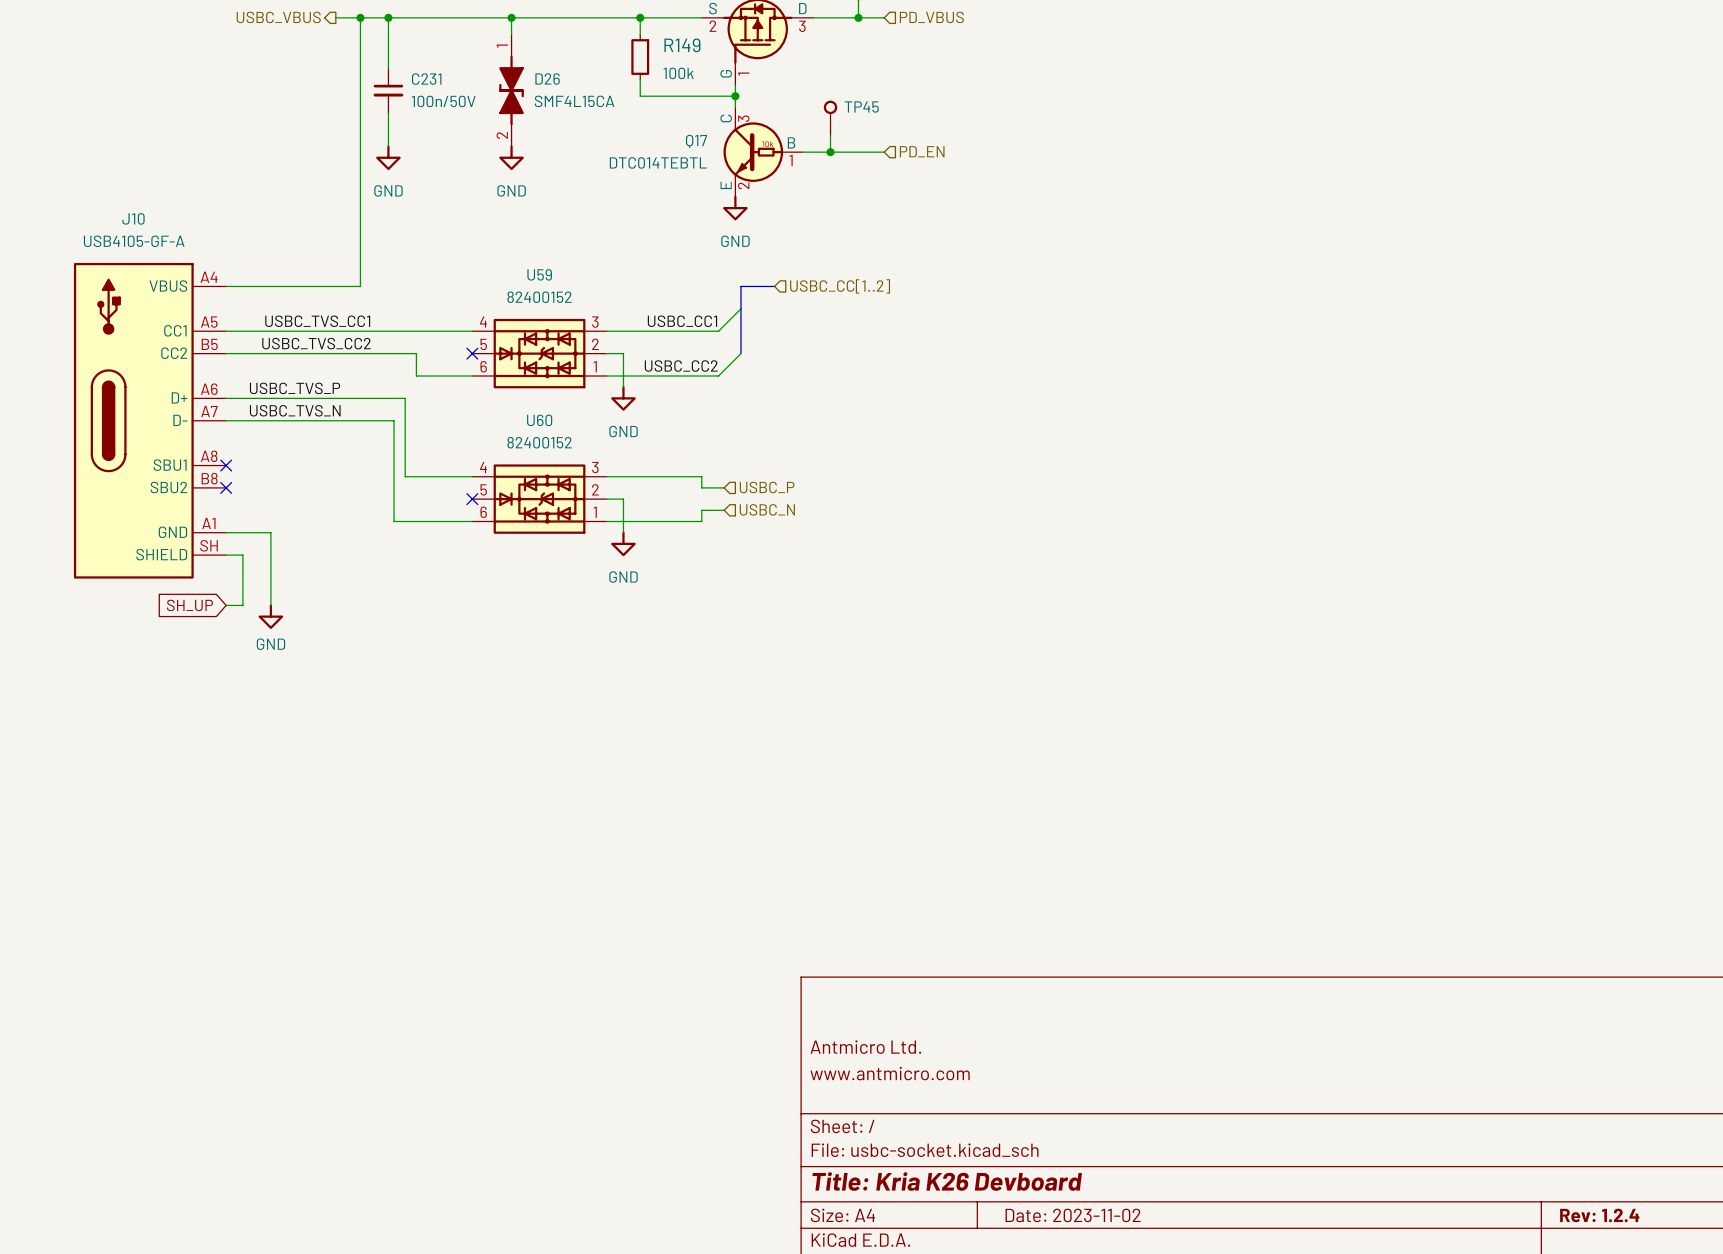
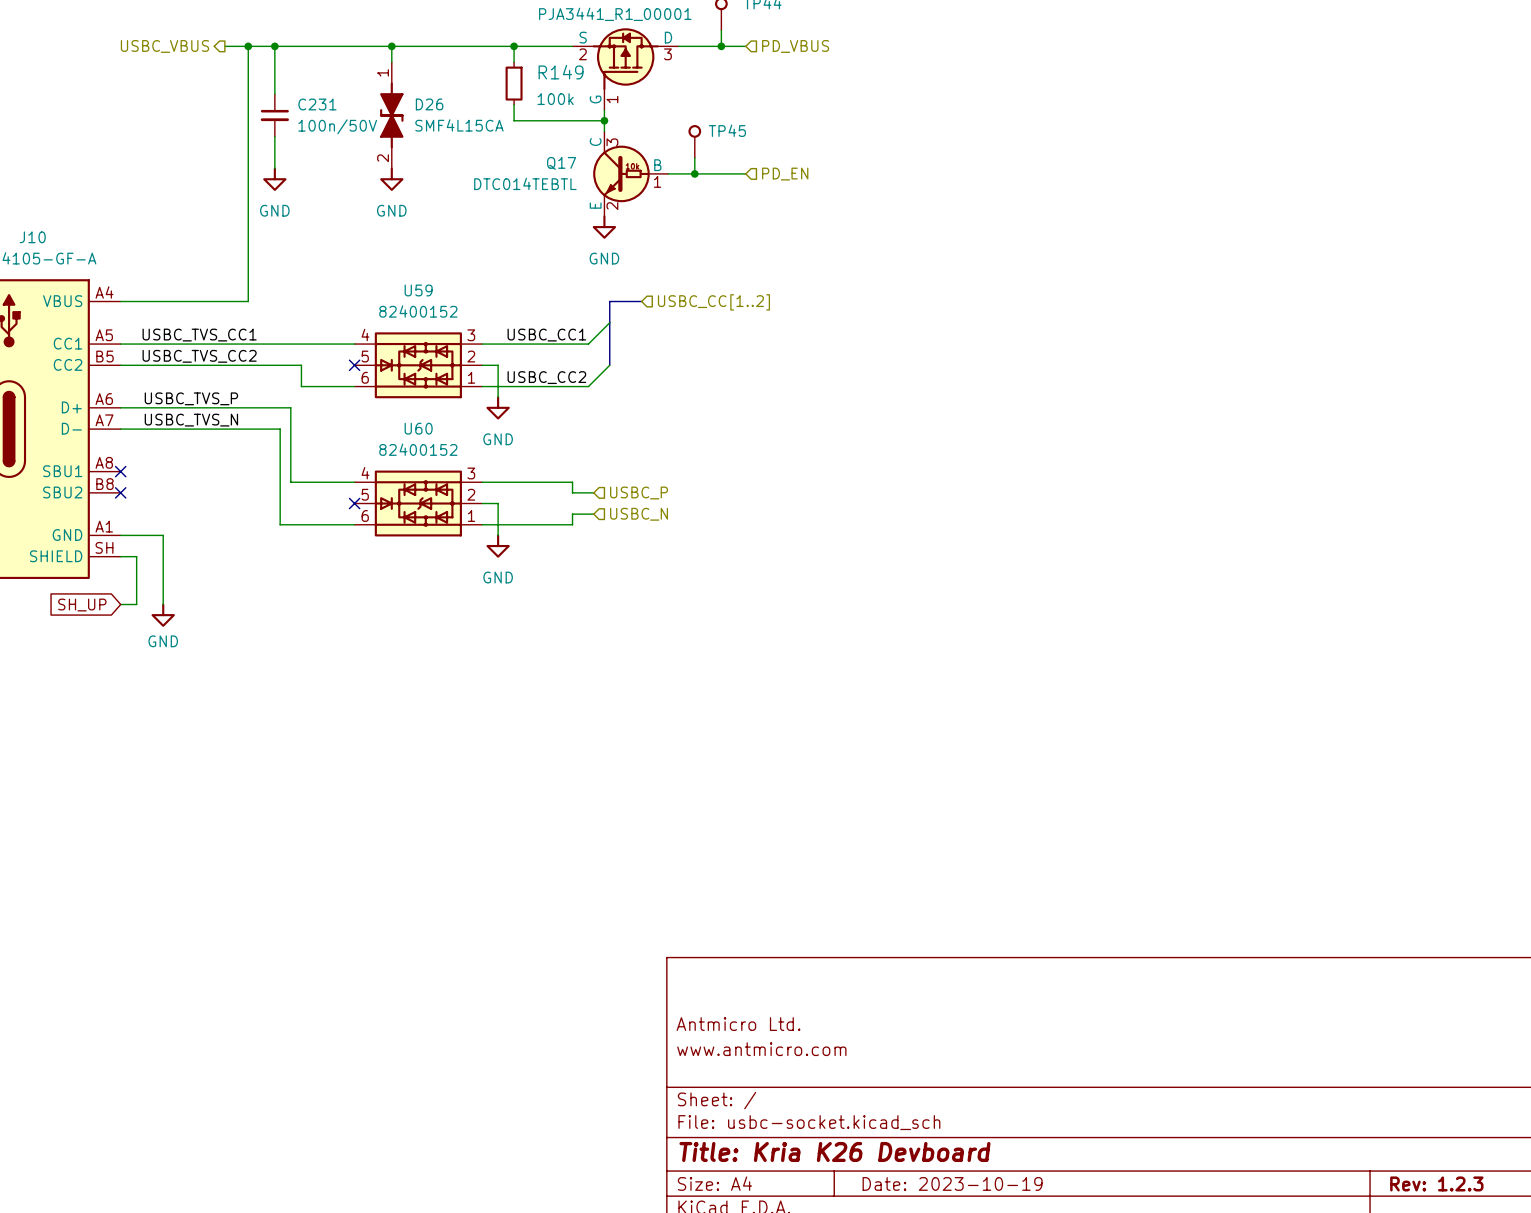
title block: Date: 2023-11-02 (1073, 1215) -> Date: 2023-10-19 (952, 1183)
title block: Rev: 1.2.4 (1599, 1215) -> Rev: 1.2.3 (1436, 1183)

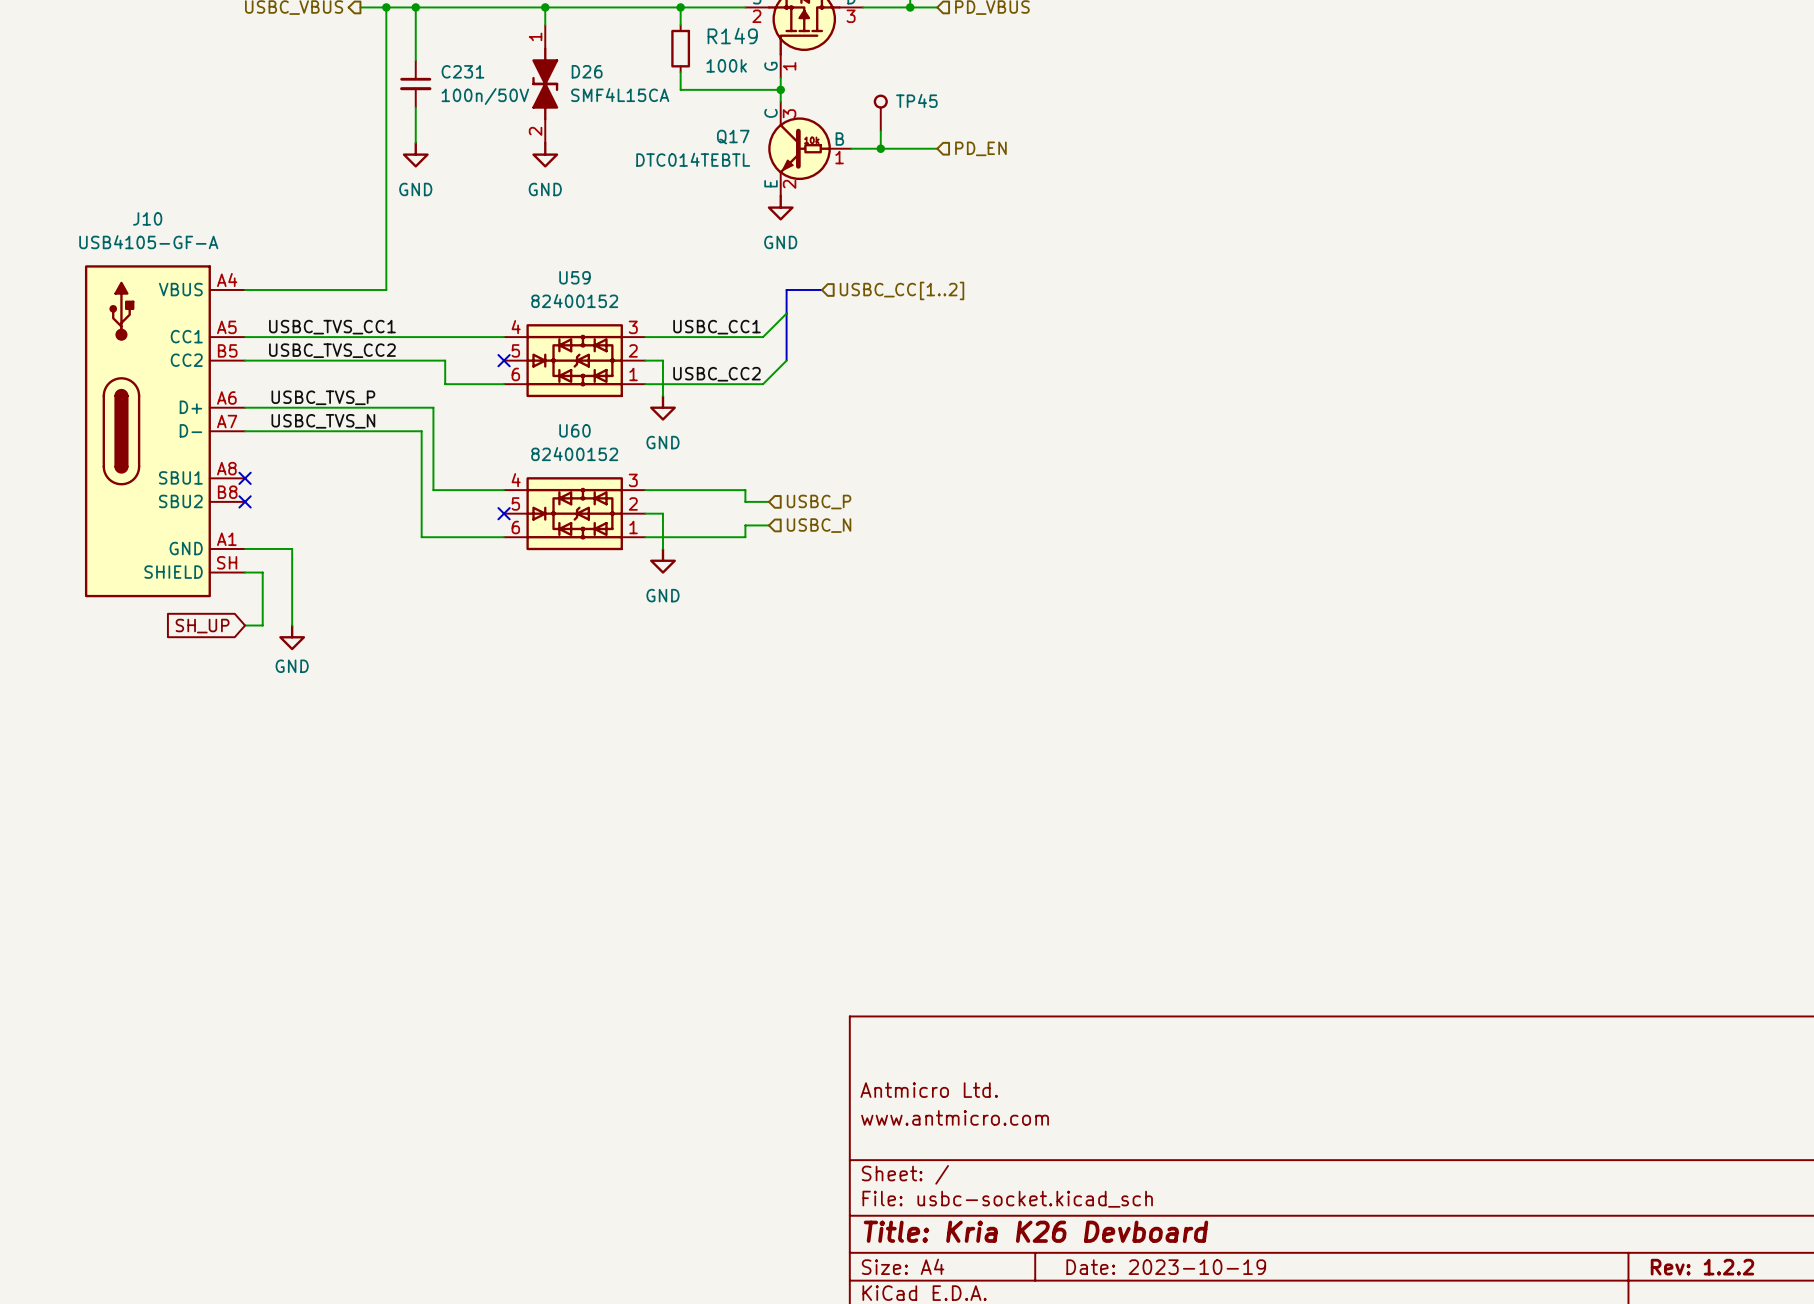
title block: Rev: 1.2.3 (1436, 1183) -> Rev: 1.2.2 (1702, 1267)

